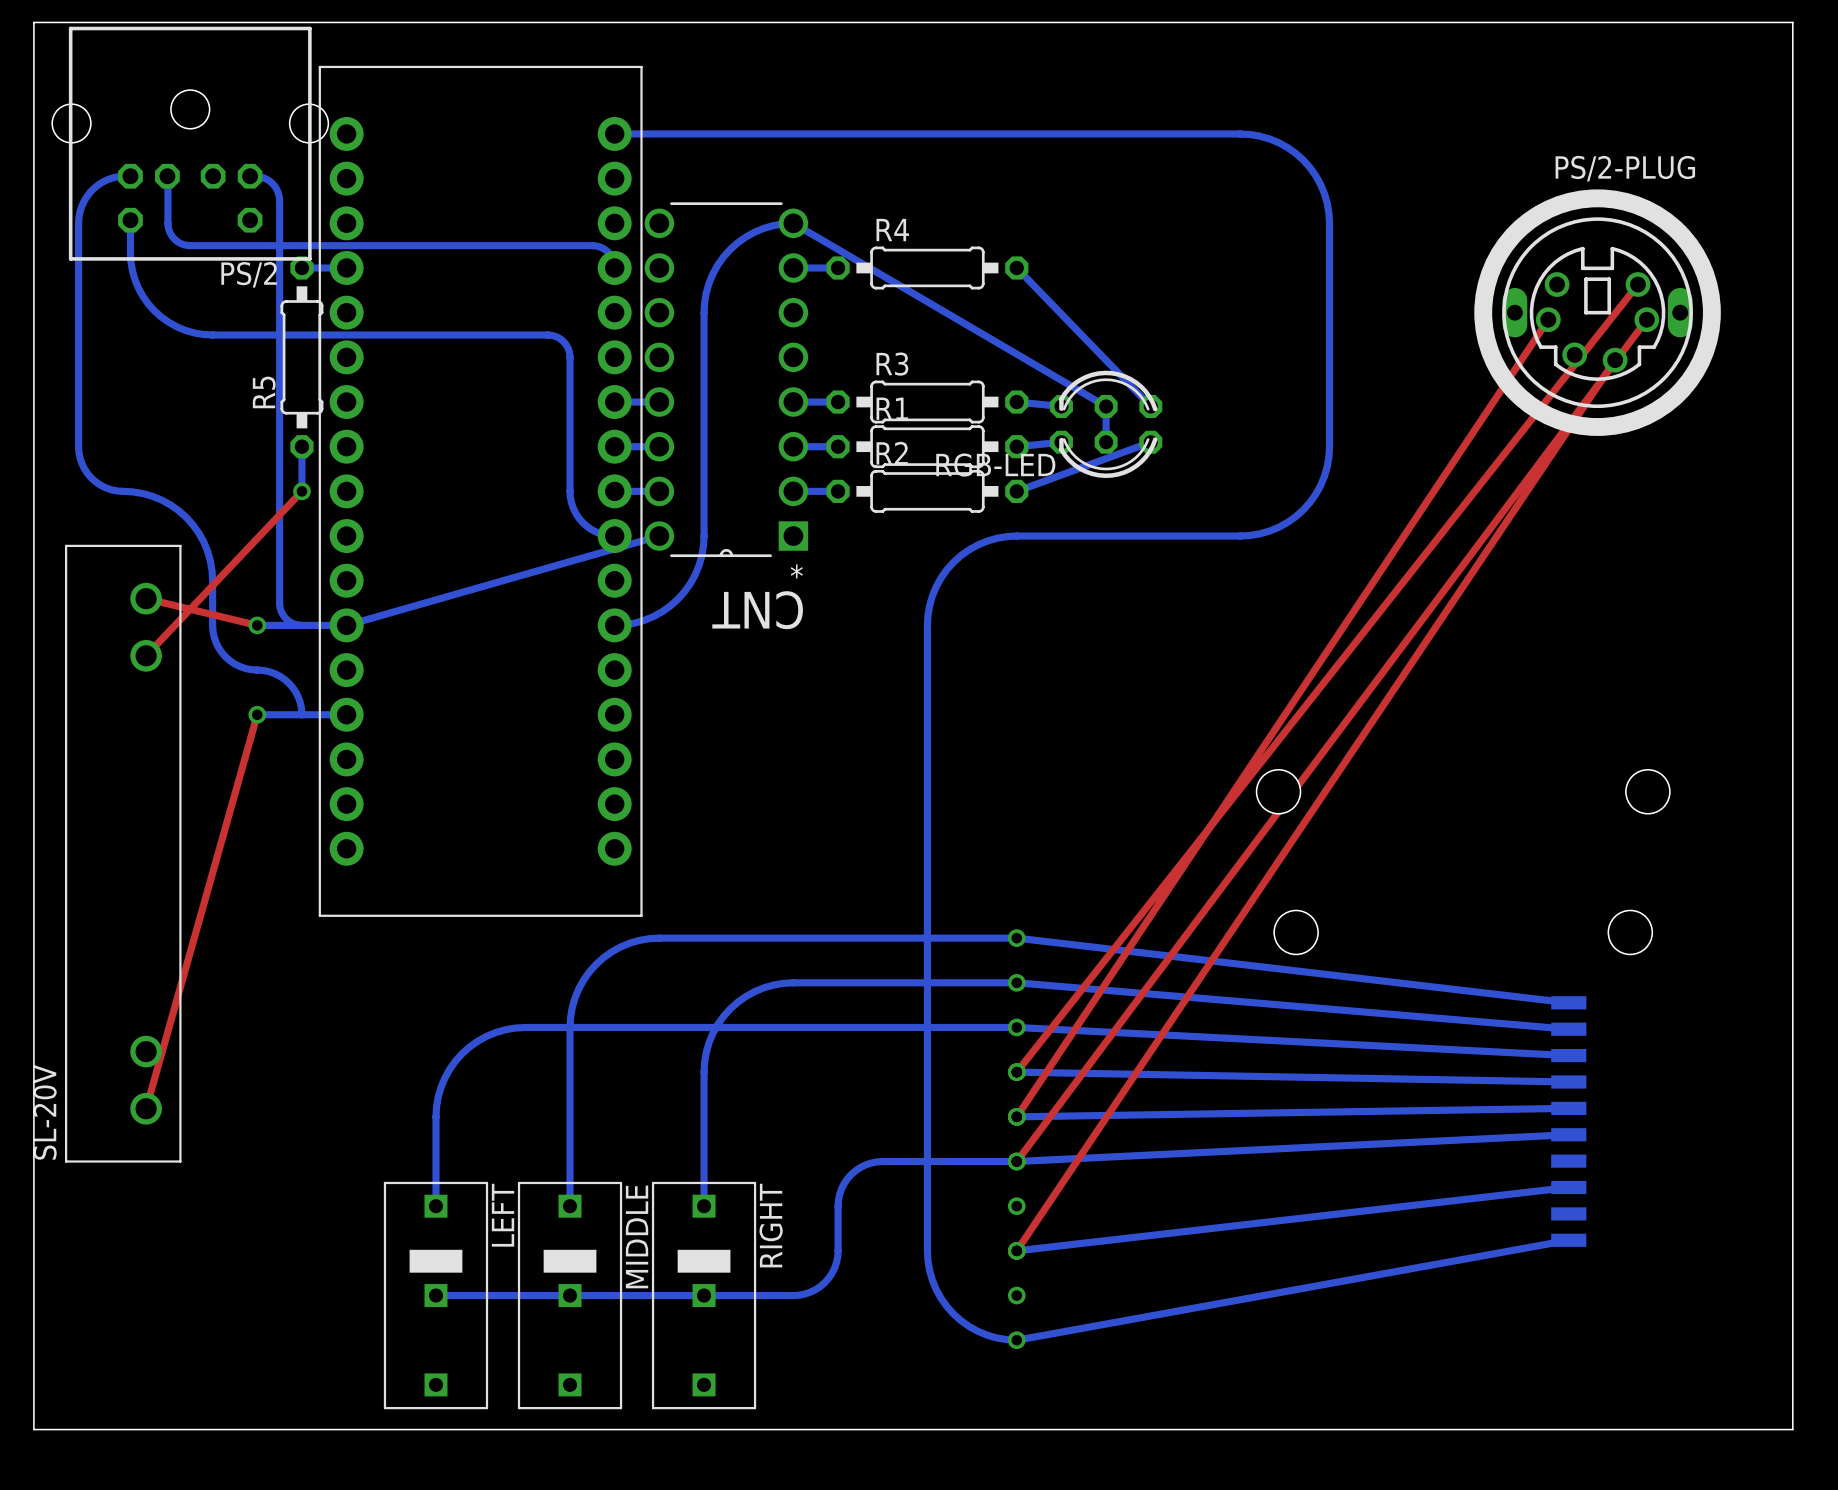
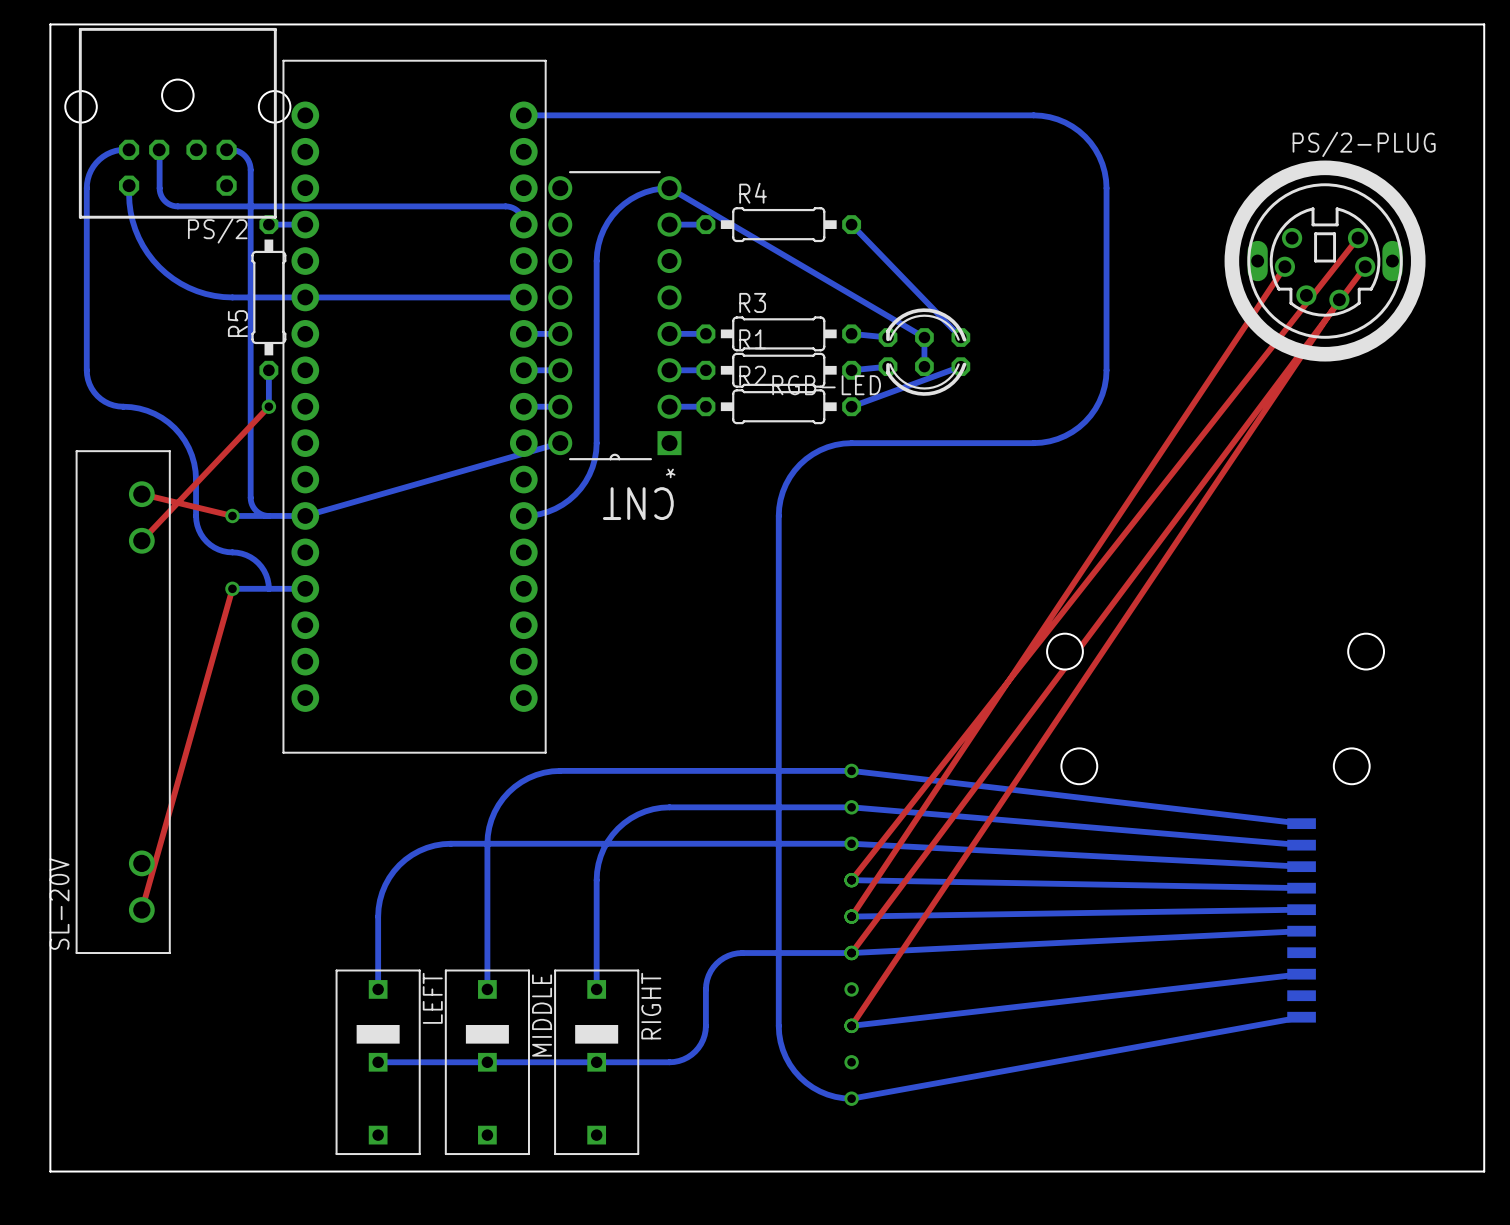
bottom track: (130, 230) (132, 271) (143, 296) (161, 317) (176, 326) (194, 332) (212, 335) (547, 335) (558, 338) (565, 343) (569, 354) (571, 502) (579, 518) (587, 526) (603, 534) (614, 536) -> (129, 194) (132, 220) (138, 237) (147, 253) (159, 267) (173, 278) (188, 287) (205, 293) (232, 297) (523, 297)

